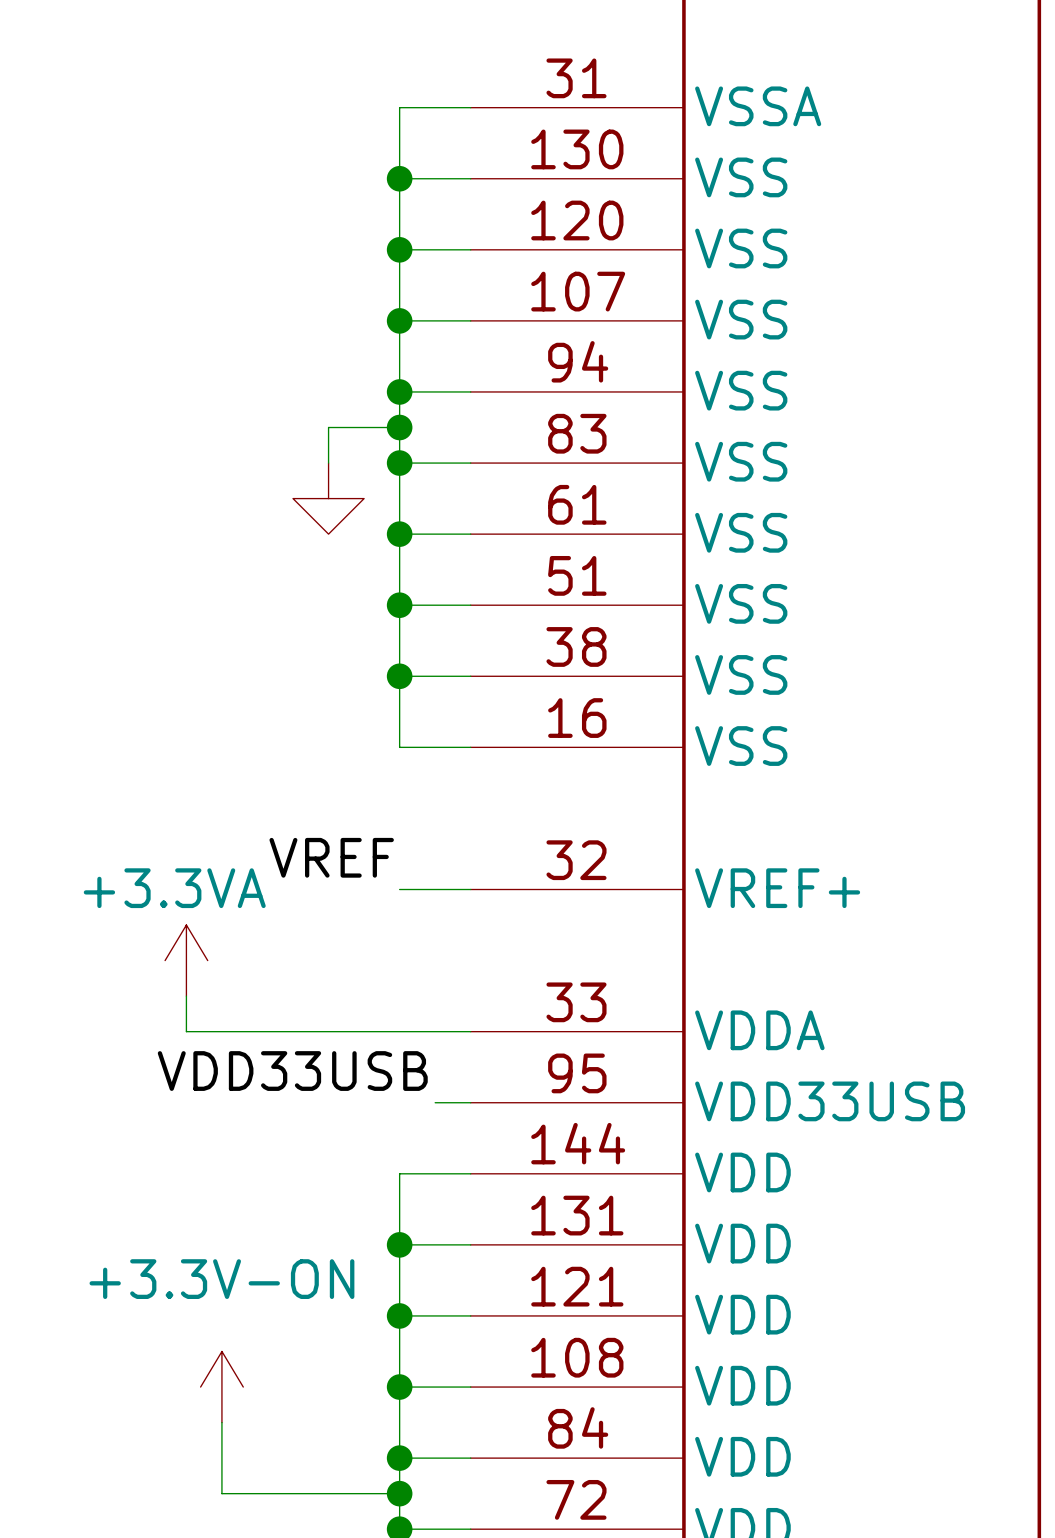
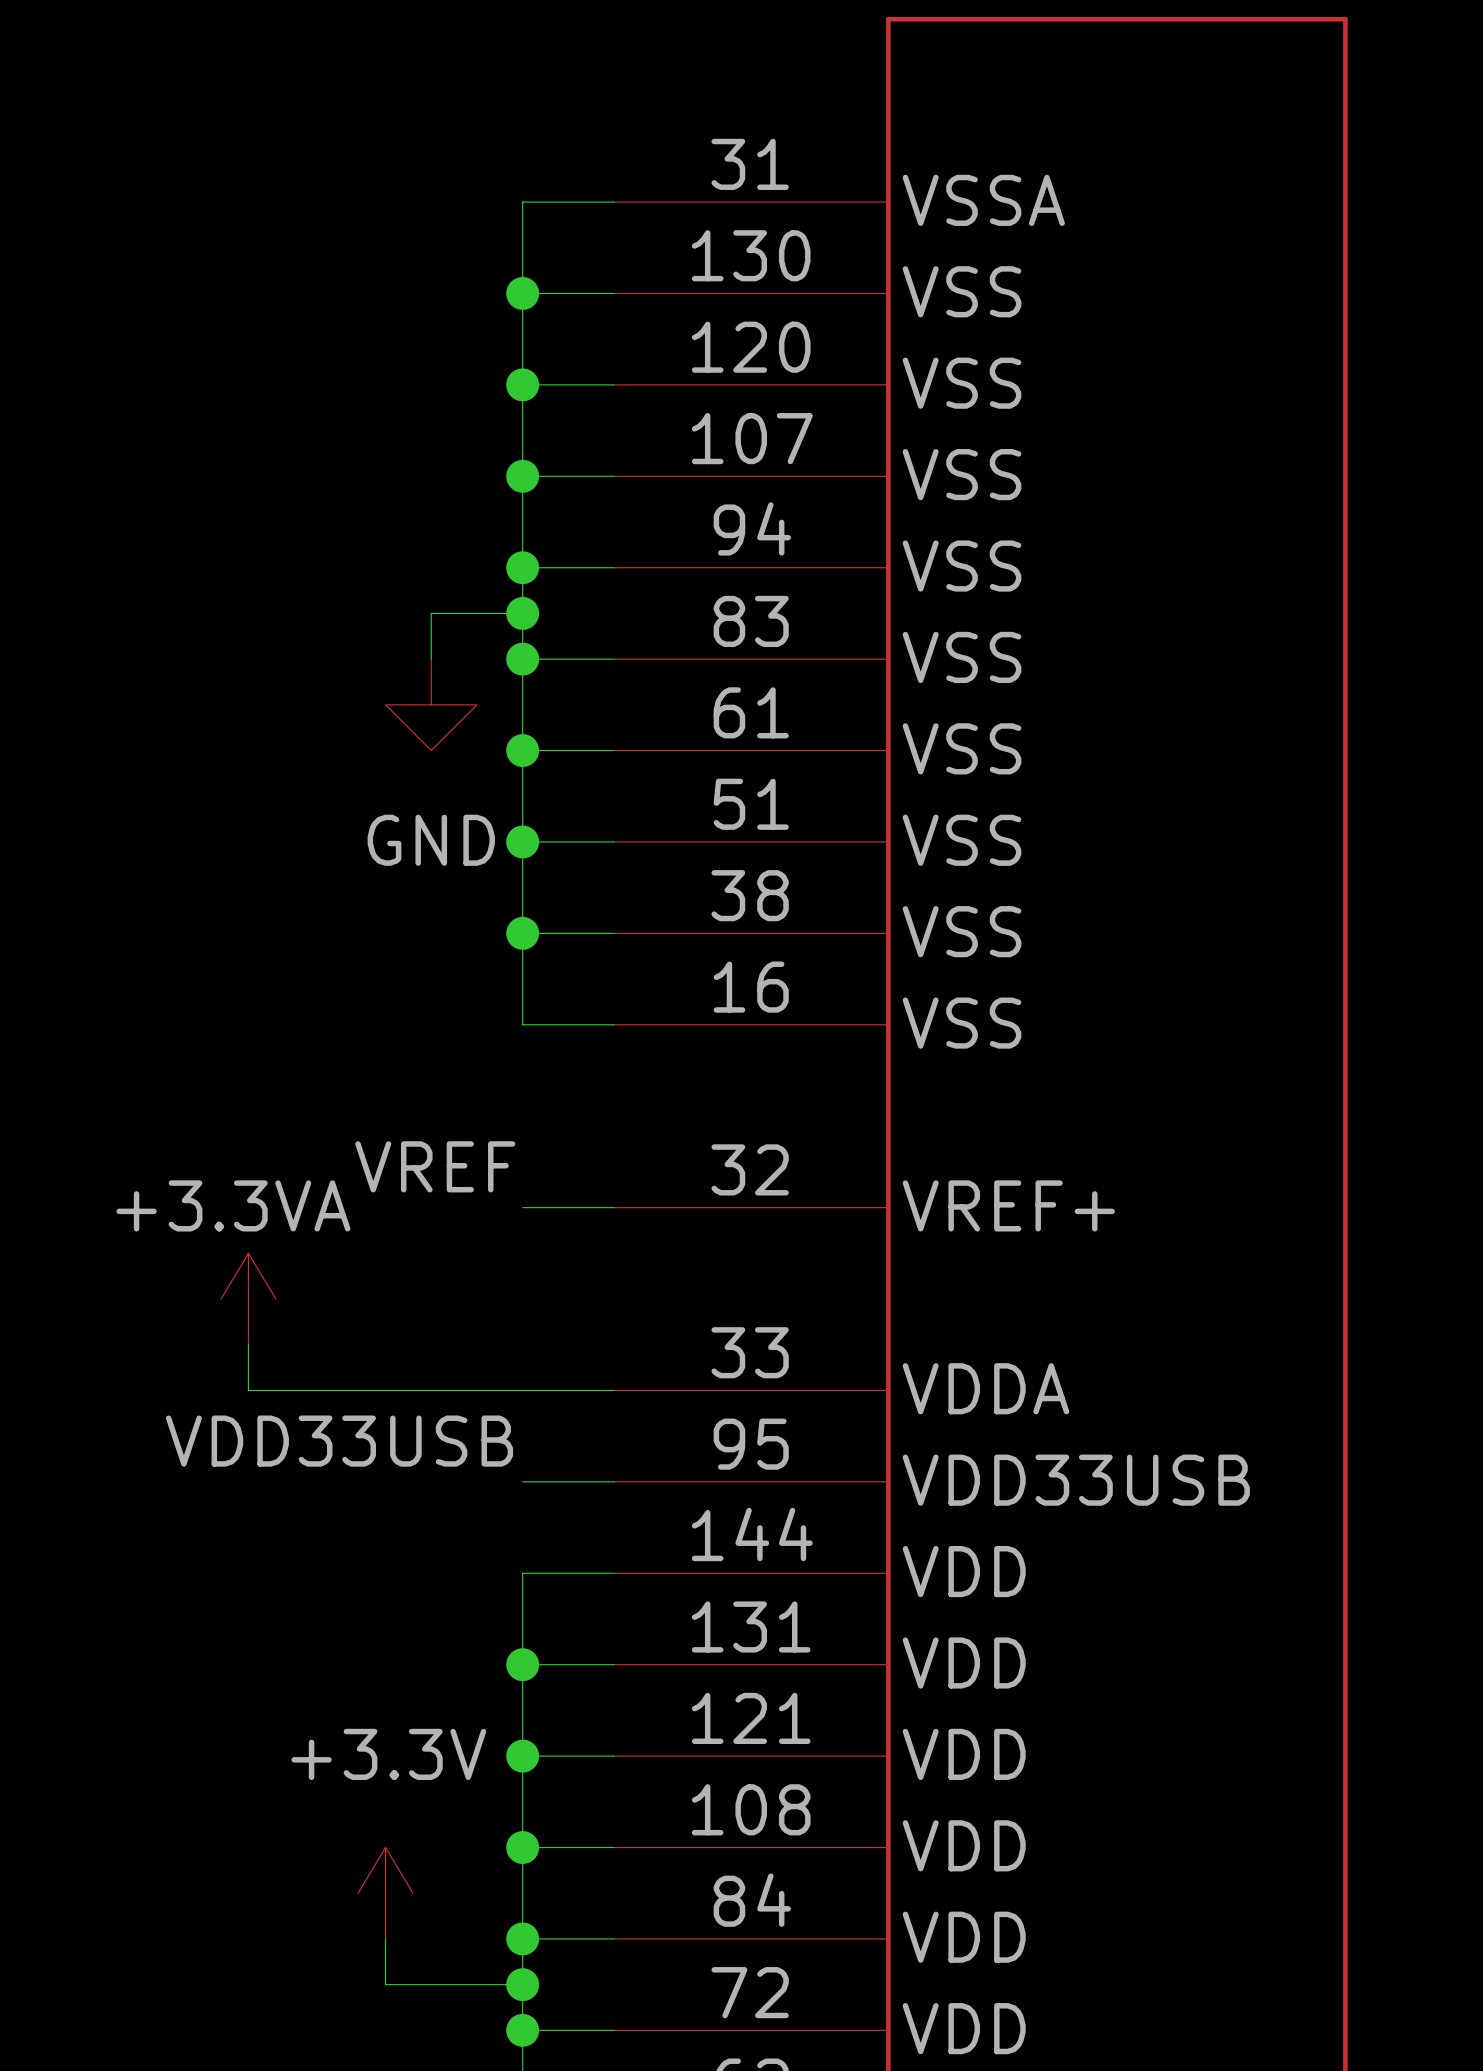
power symbol text: none -> GND (431, 840)
label position: VDD33USB (292, 1071) -> VDD33USB (339, 1441)
wire: none -> (522, 1481) (568, 1481)
power symbol: +3.3V-ON (221, 1387) -> none
wire: (221, 1422) (221, 1493) (293, 1493) -> (385, 1938) (385, 1984)
power symbol: none -> +3.3V (385, 1893)

